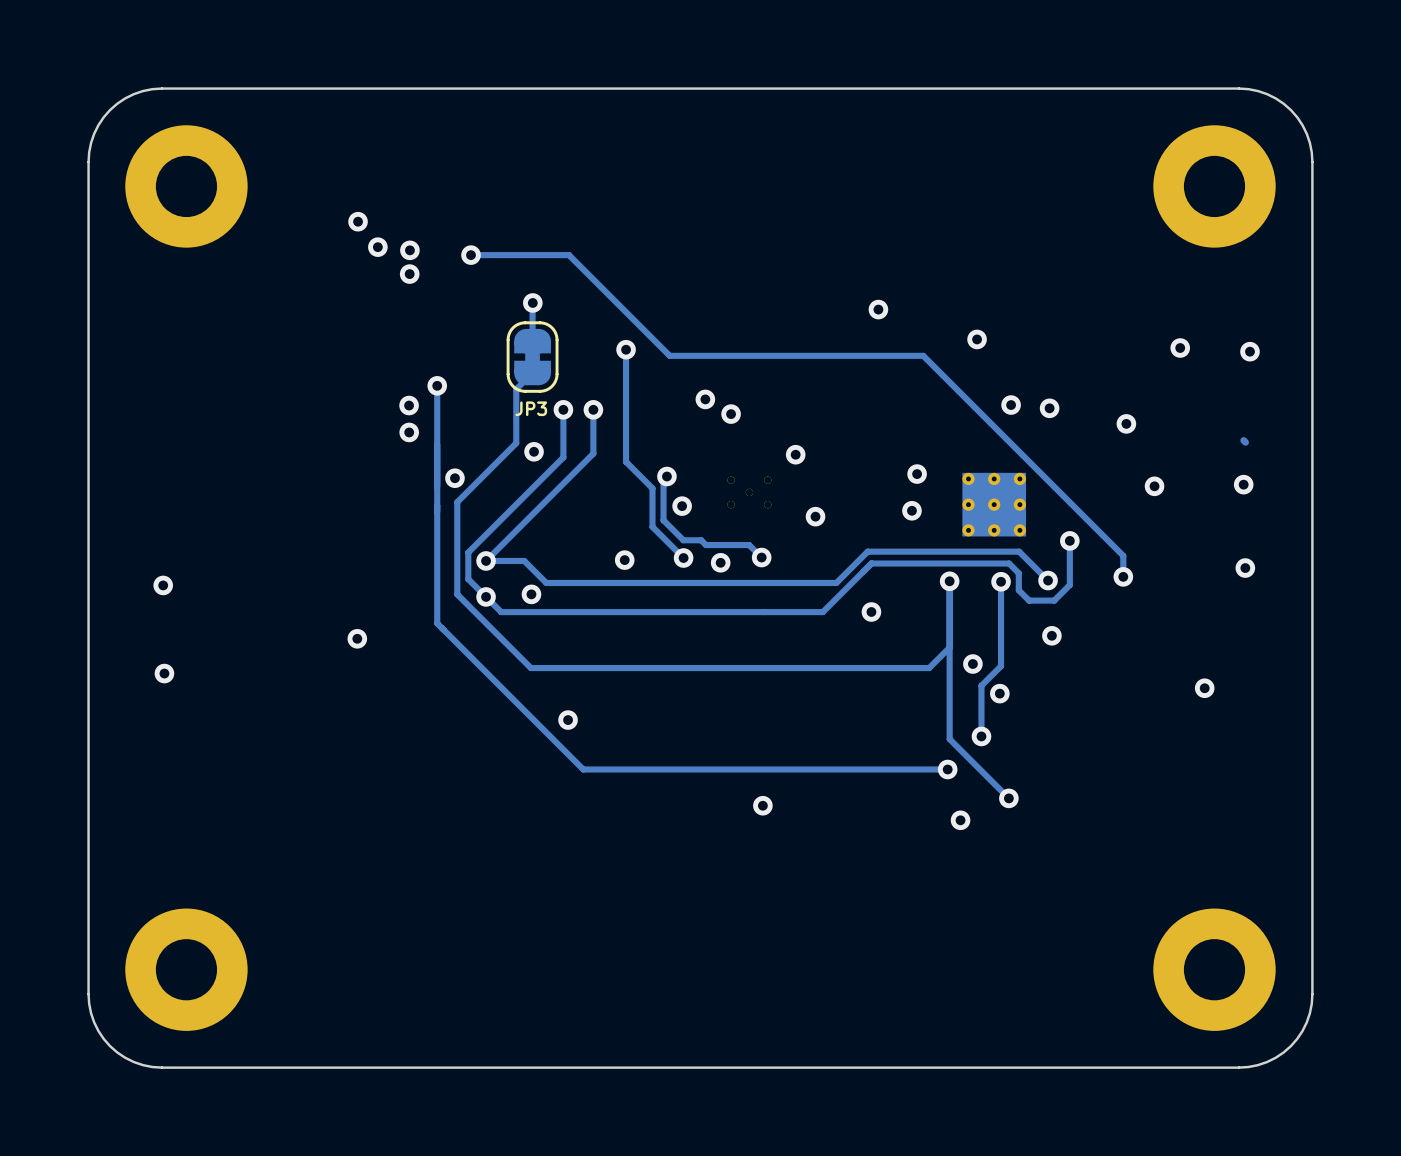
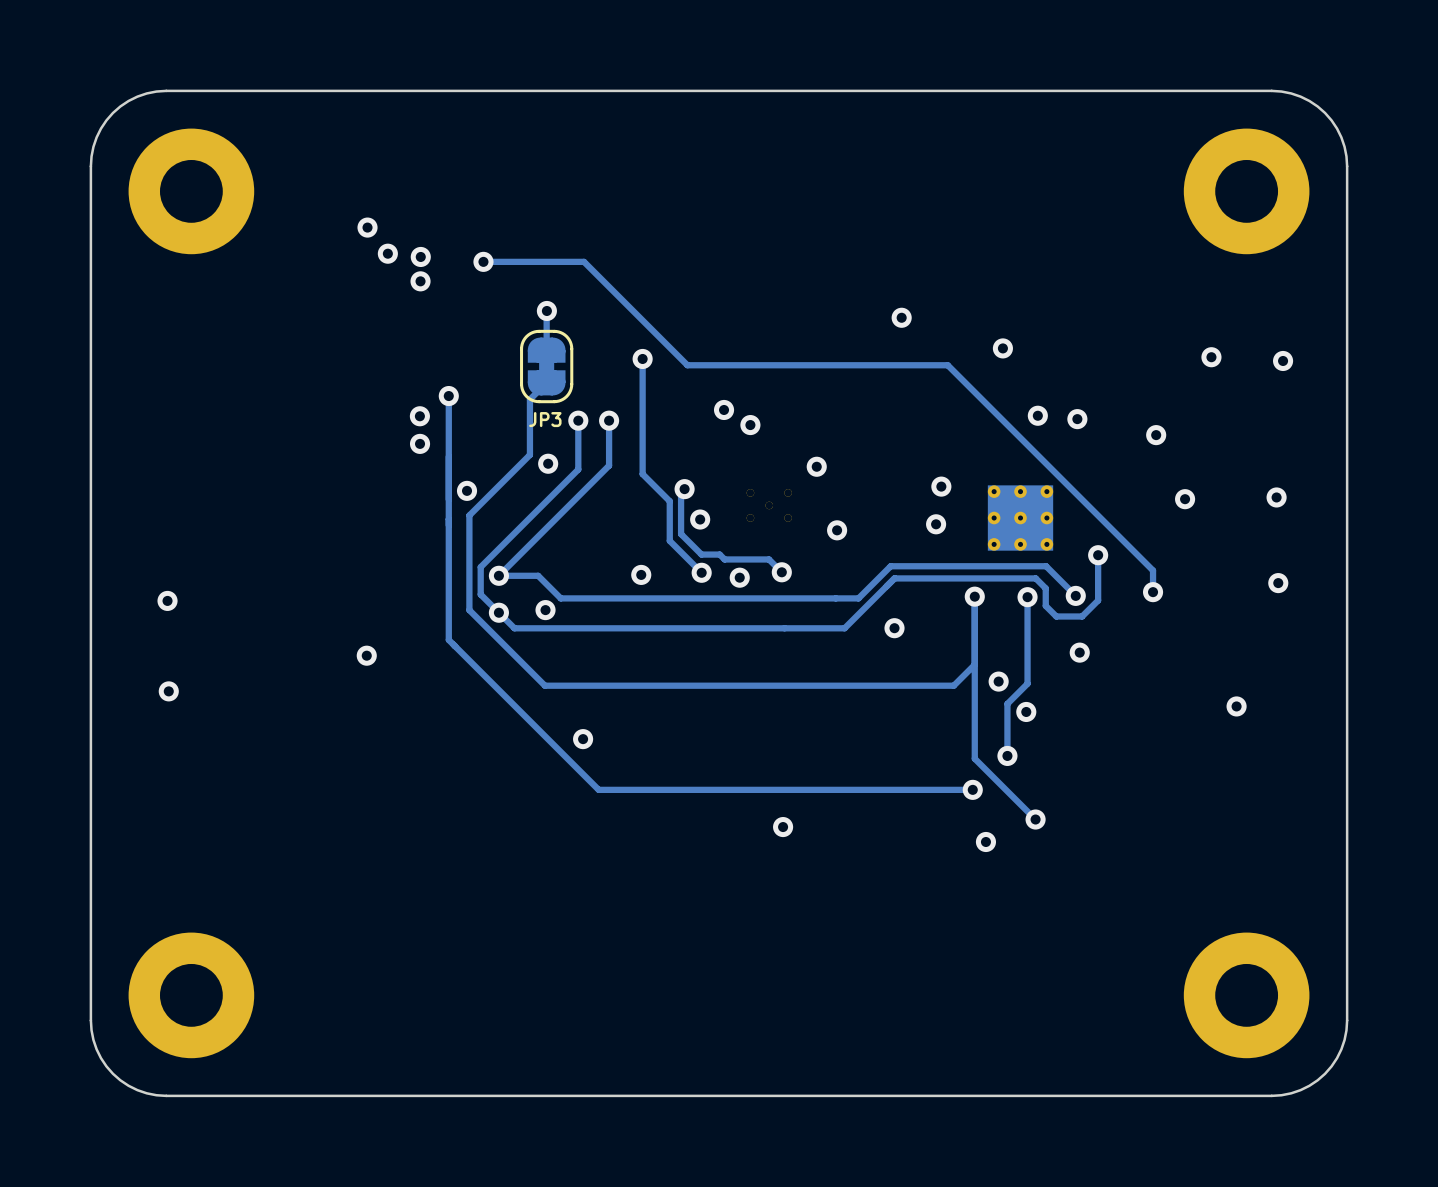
track: (1243, 440) (1245, 442) -> none

